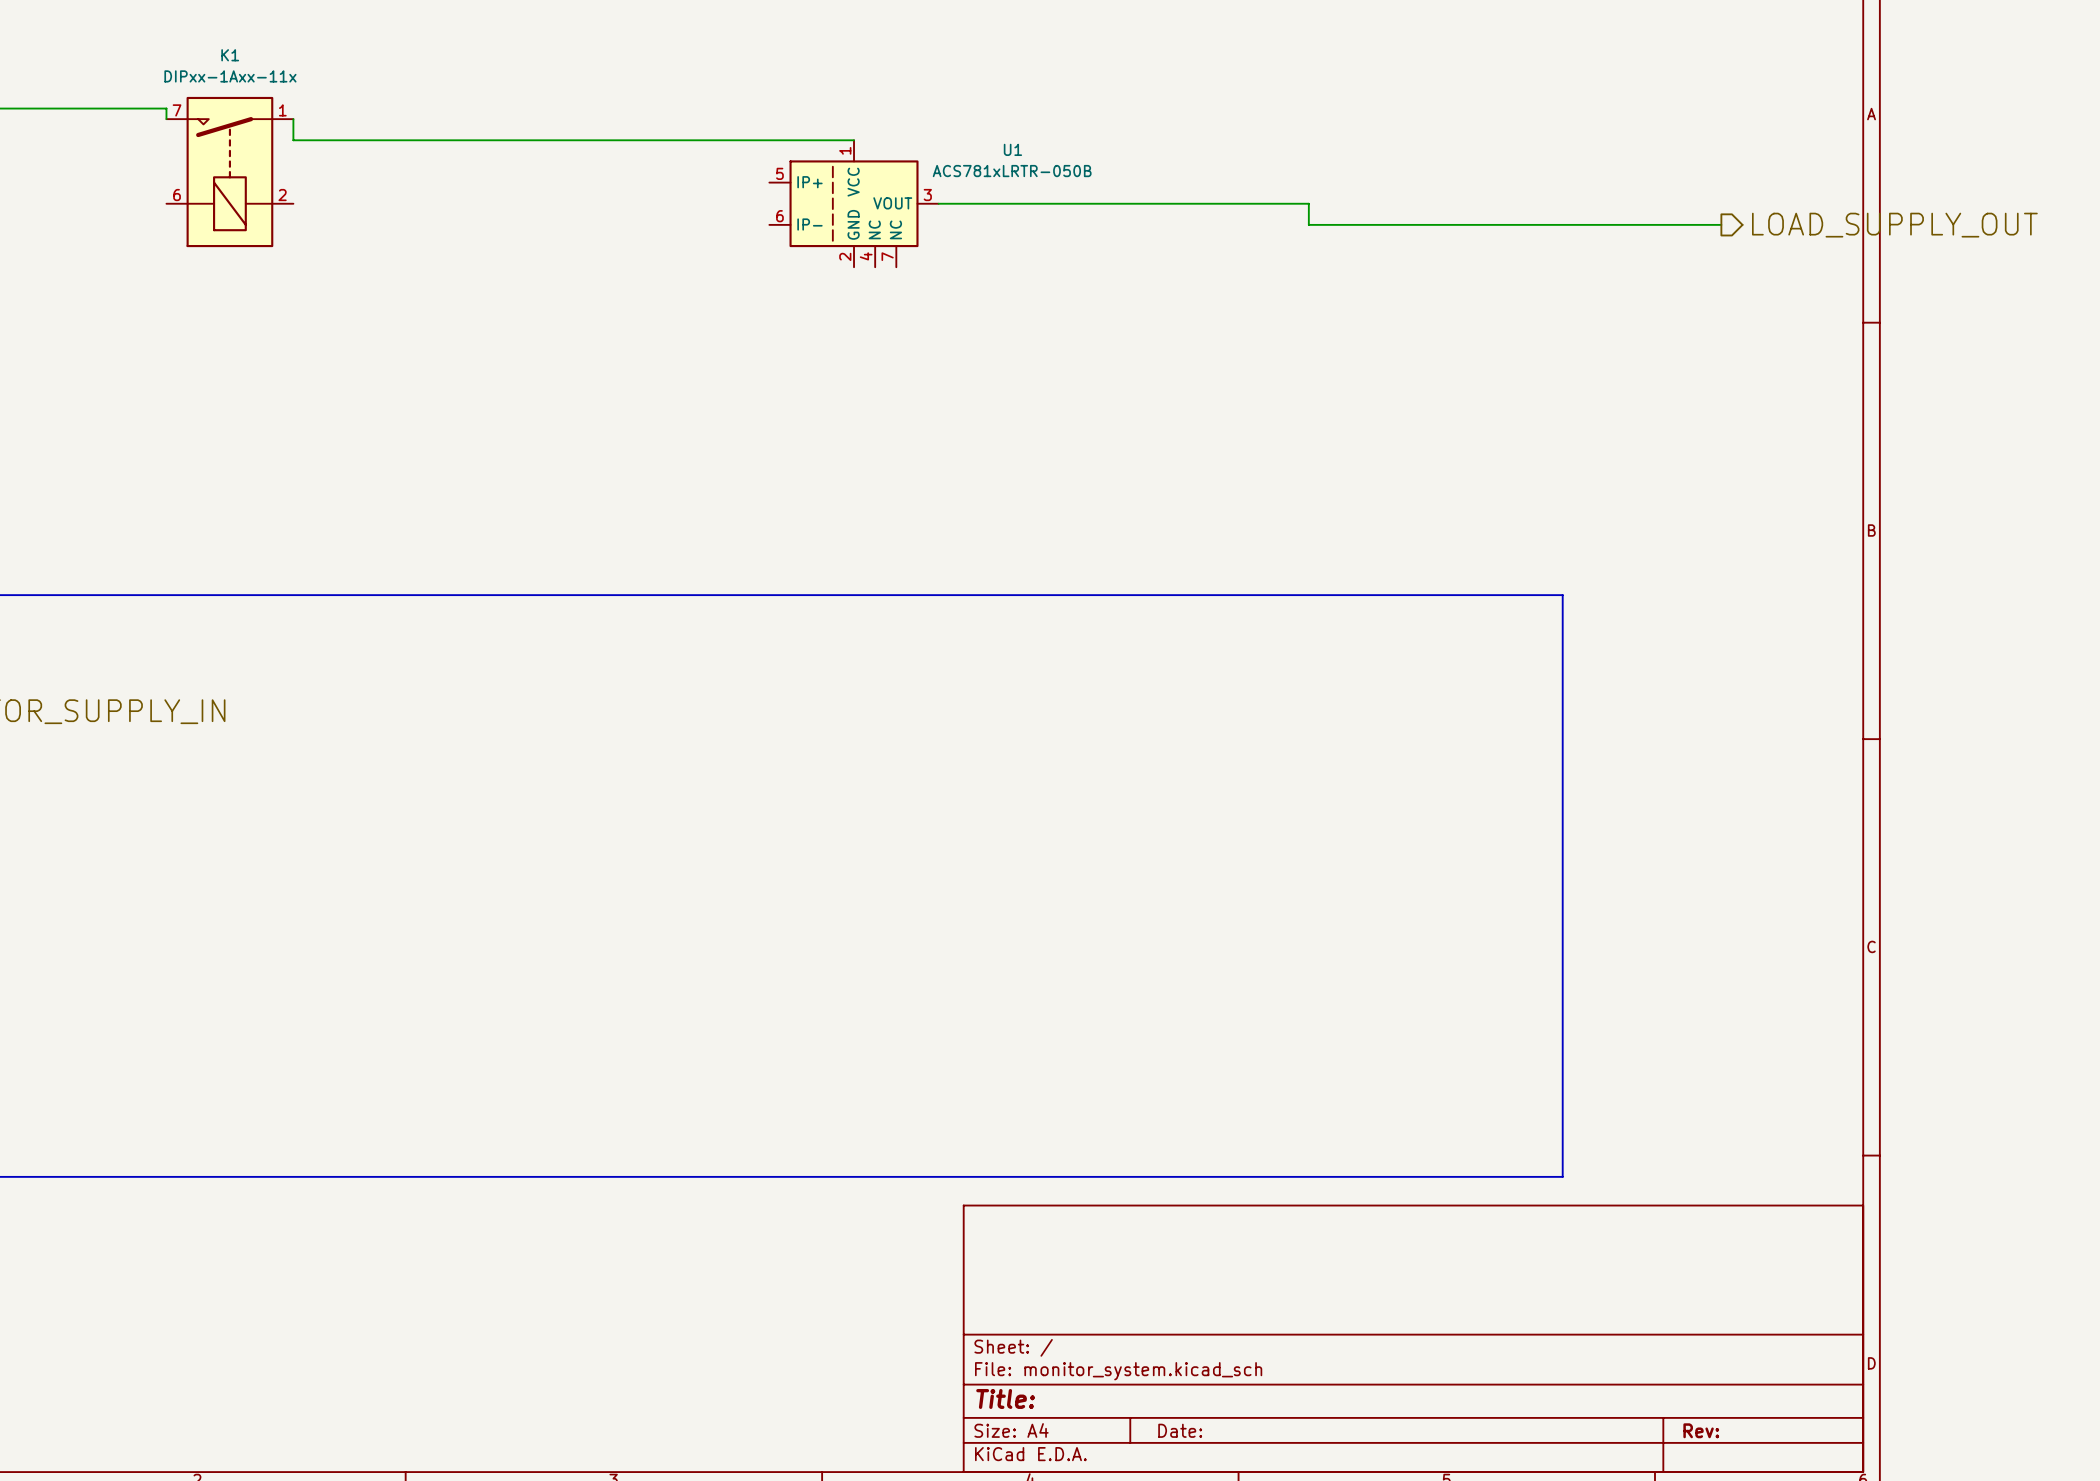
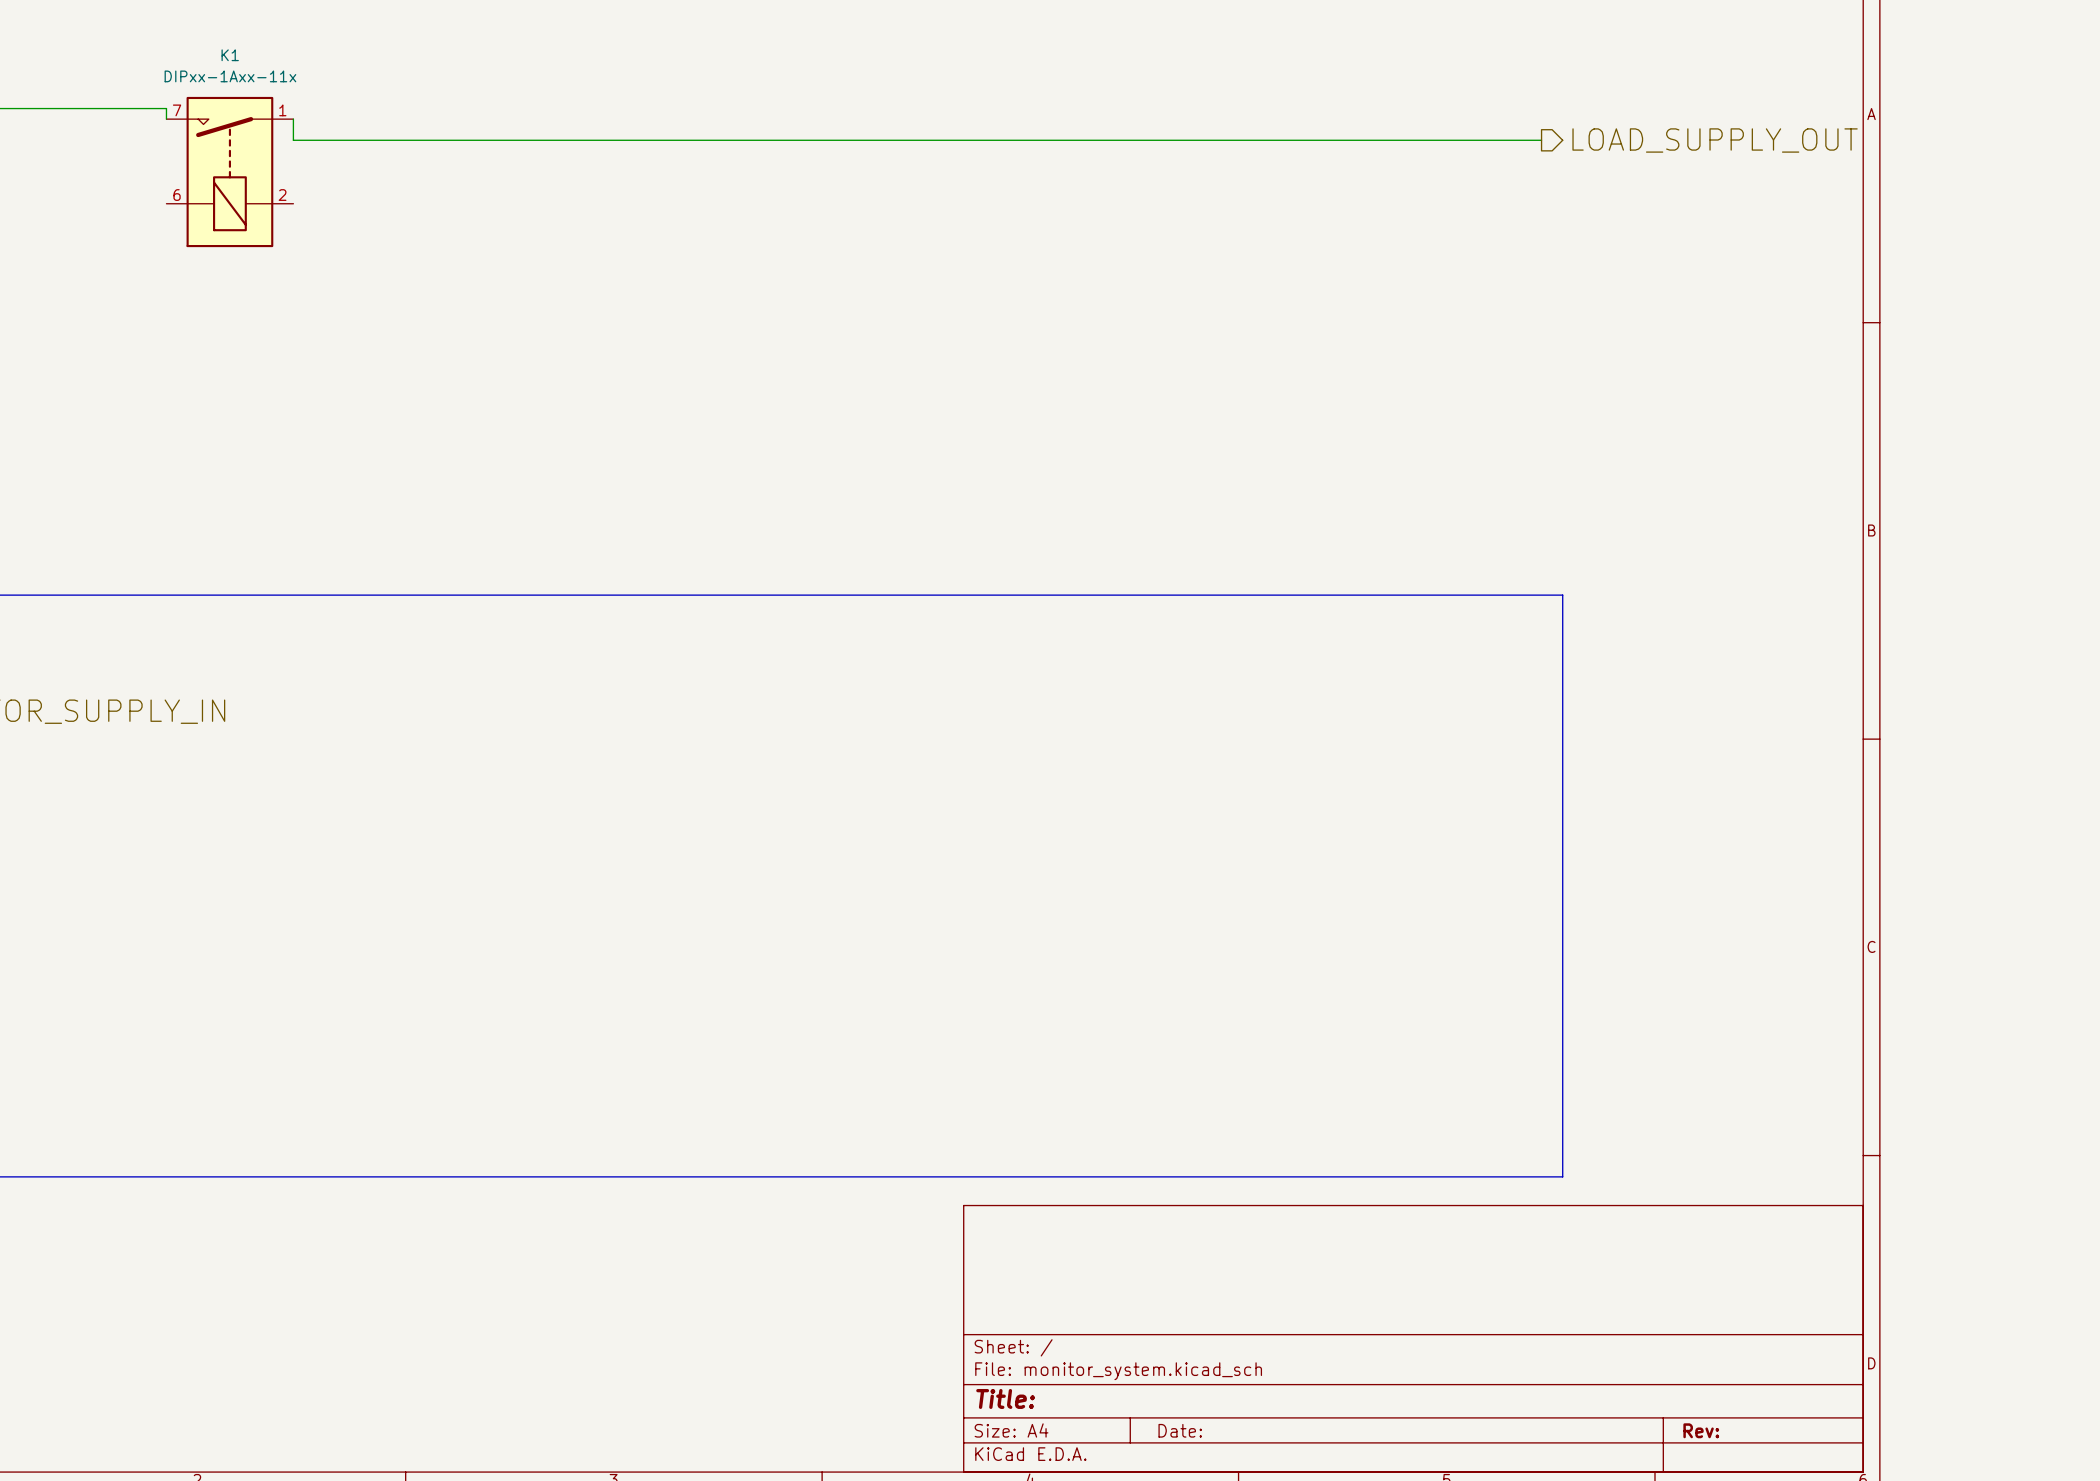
wire: none -> (854, 140) (1541, 140)
U1: ACS781xLRTR-050B (854, 203) -> none
wire: (938, 203) (1308, 203) (1308, 224) (1721, 224) -> none
hierarchical label position: LOAD_SUPPLY_OUT (1894, 225) -> LOAD_SUPPLY_OUT (1715, 140)

